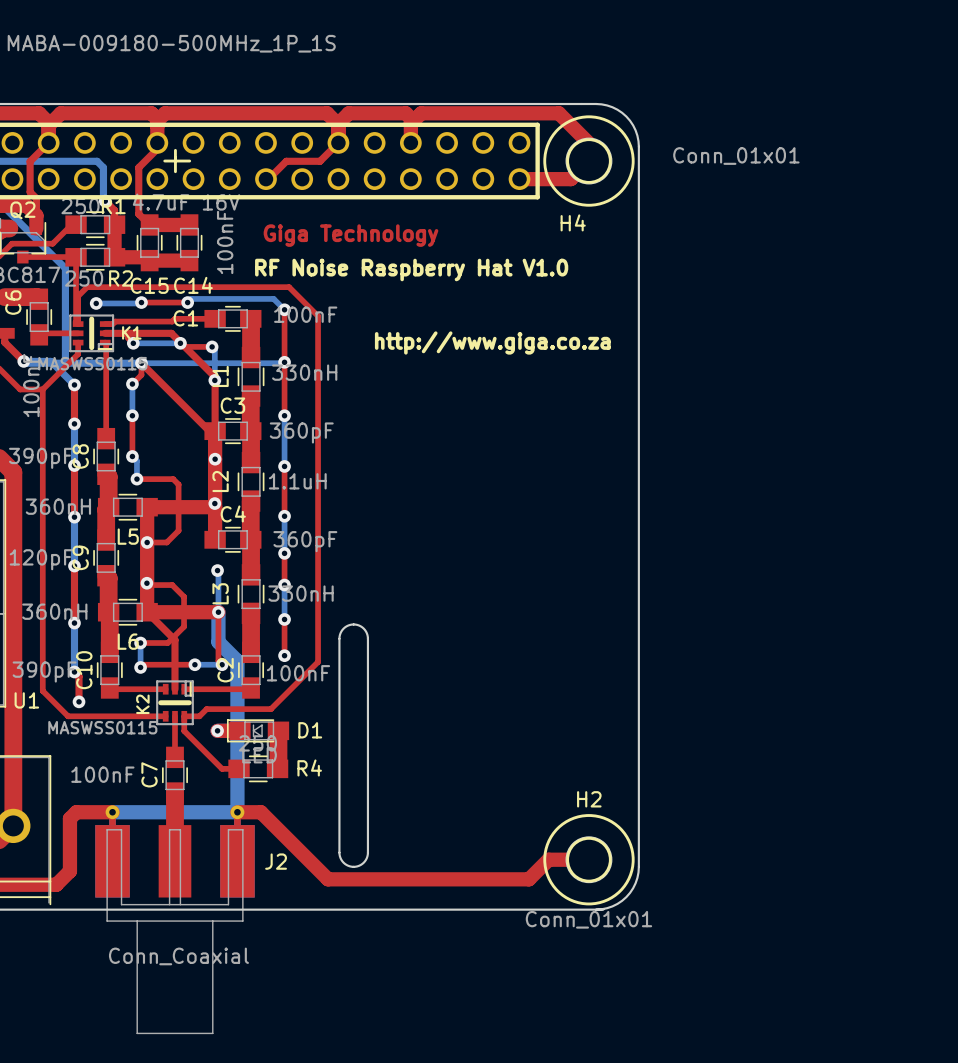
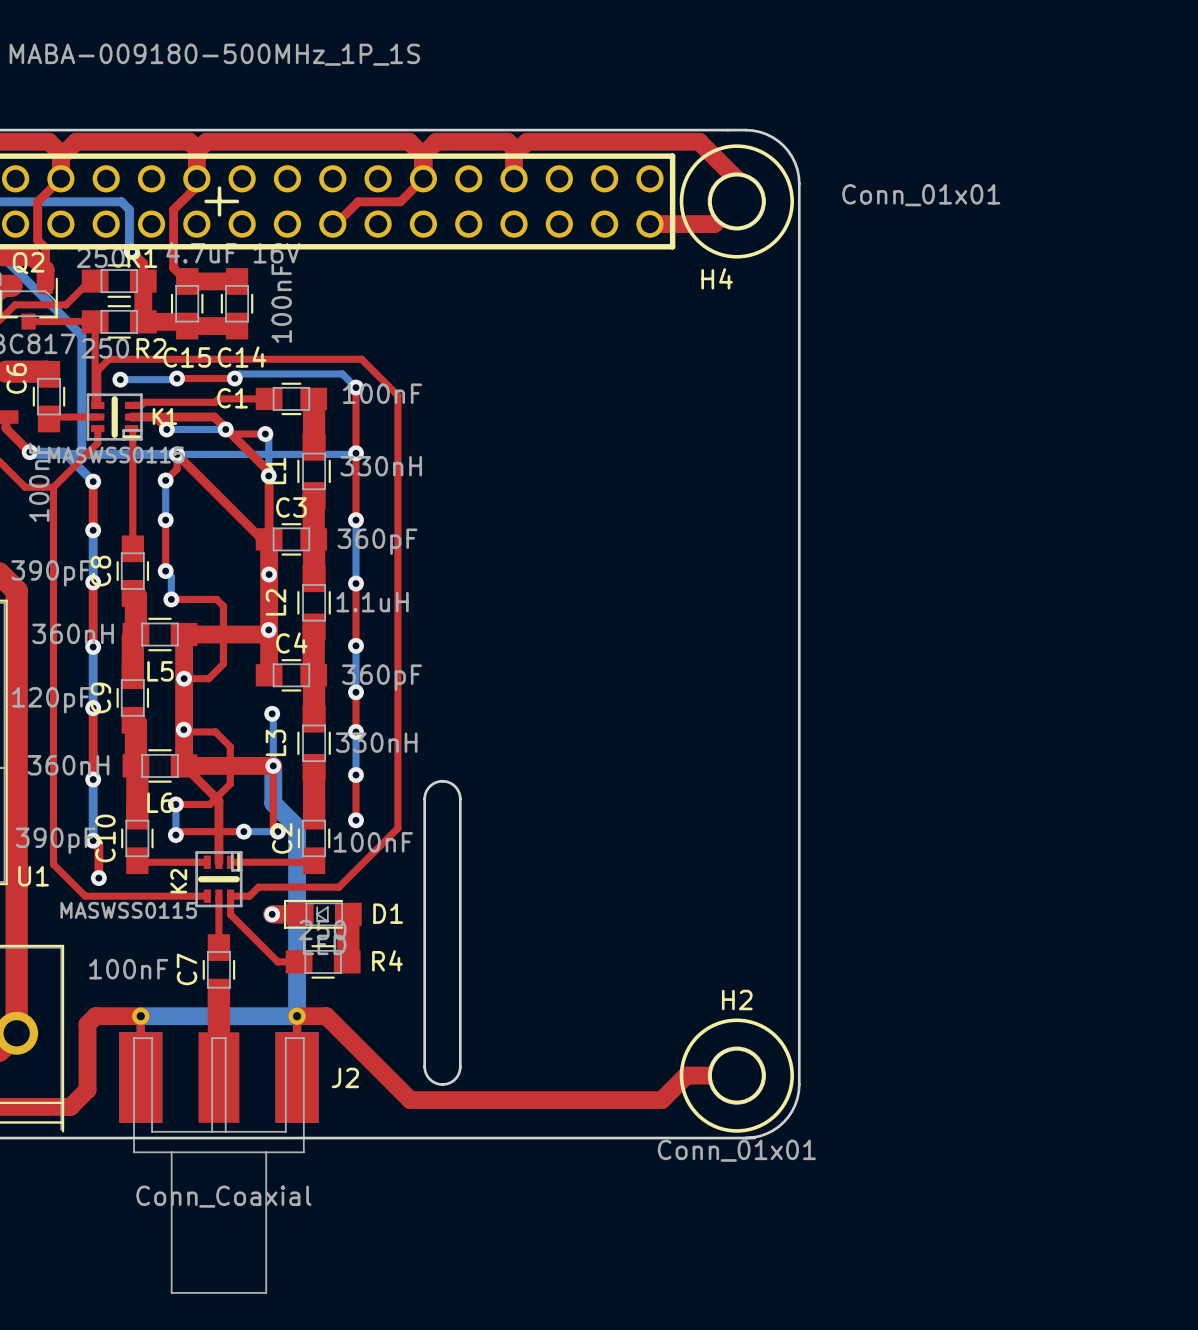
text: Giga Technology (350, 235) -> none
text: RF Noise Raspberry Hat V1.0 (411, 269) -> none
text: http://www.giga.co.za (492, 342) -> none

